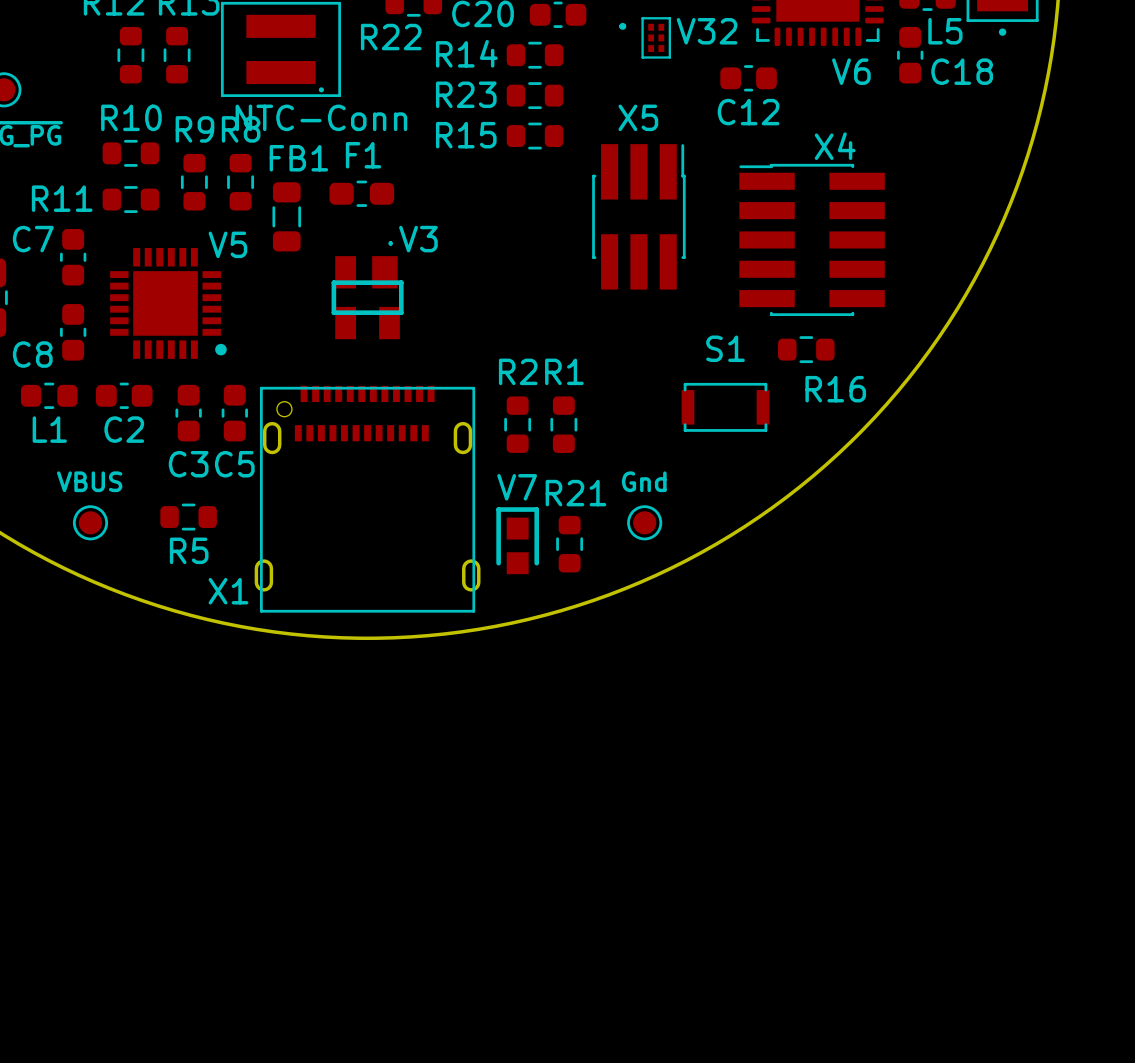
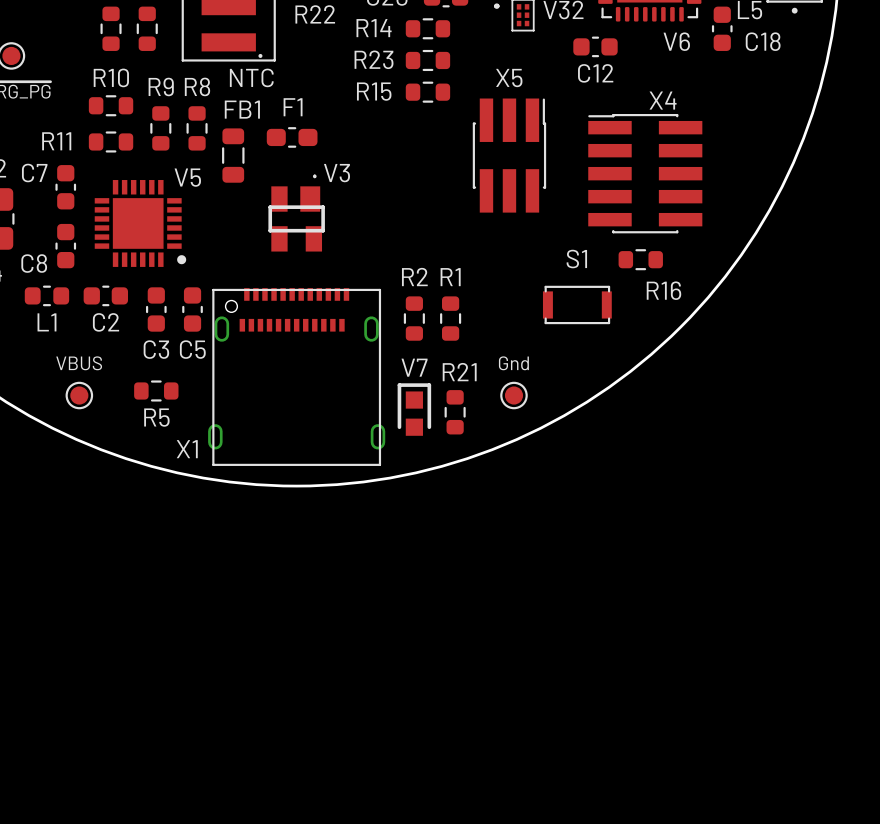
part value: NTC-Conn (321, 117) -> NTC (251, 77)

